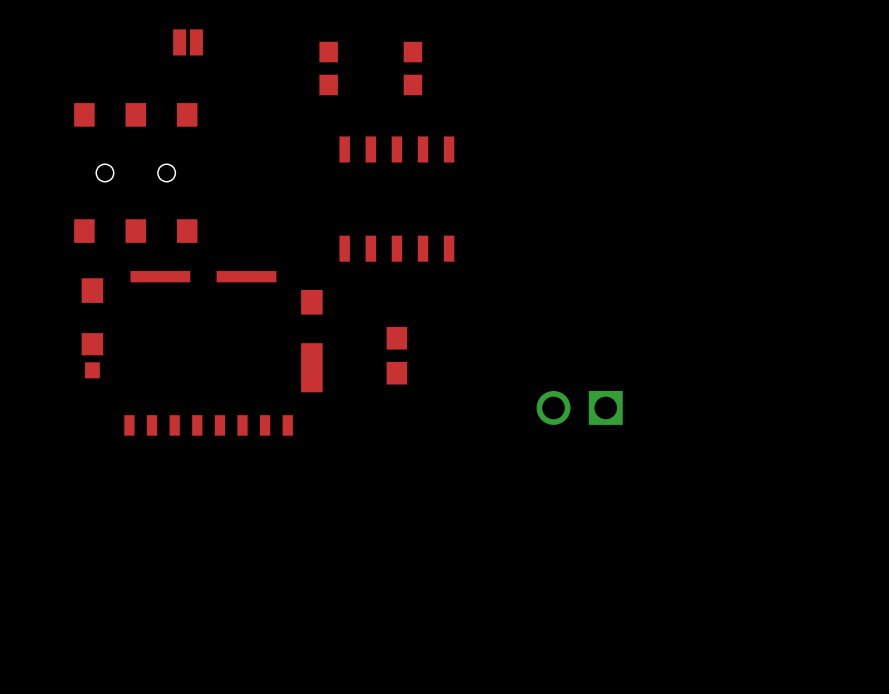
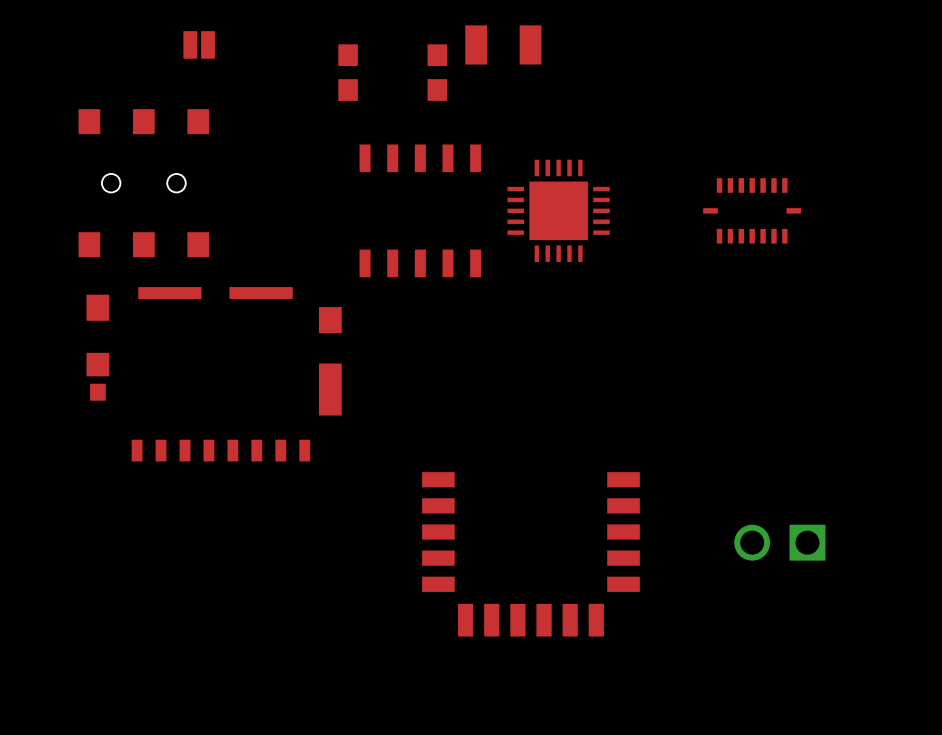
part: none -> (503, 44)
part: none -> (558, 210)
part: none -> (752, 210)
part: (396, 355) -> none
part position: (579, 407) -> (779, 542)
part: none -> (530, 554)

